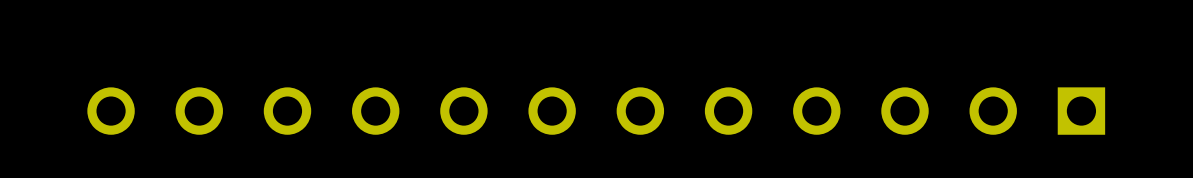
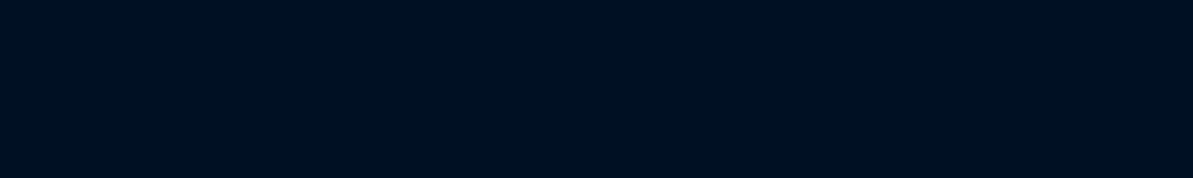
part: (596, 111) -> none

